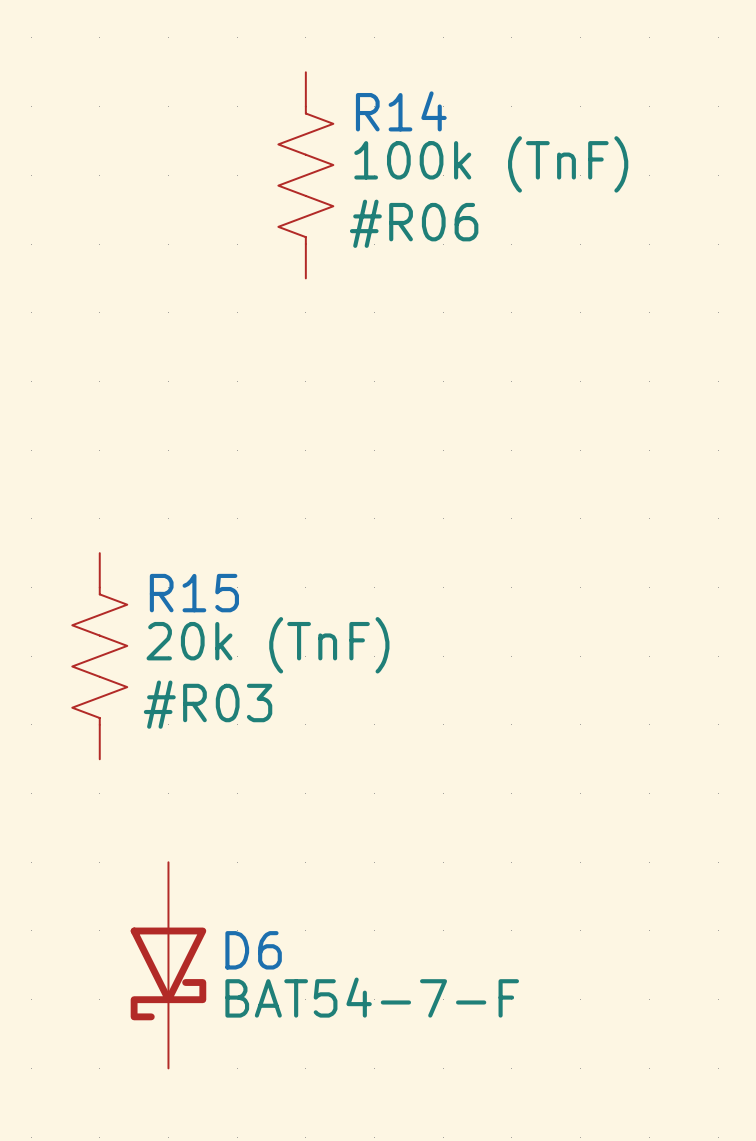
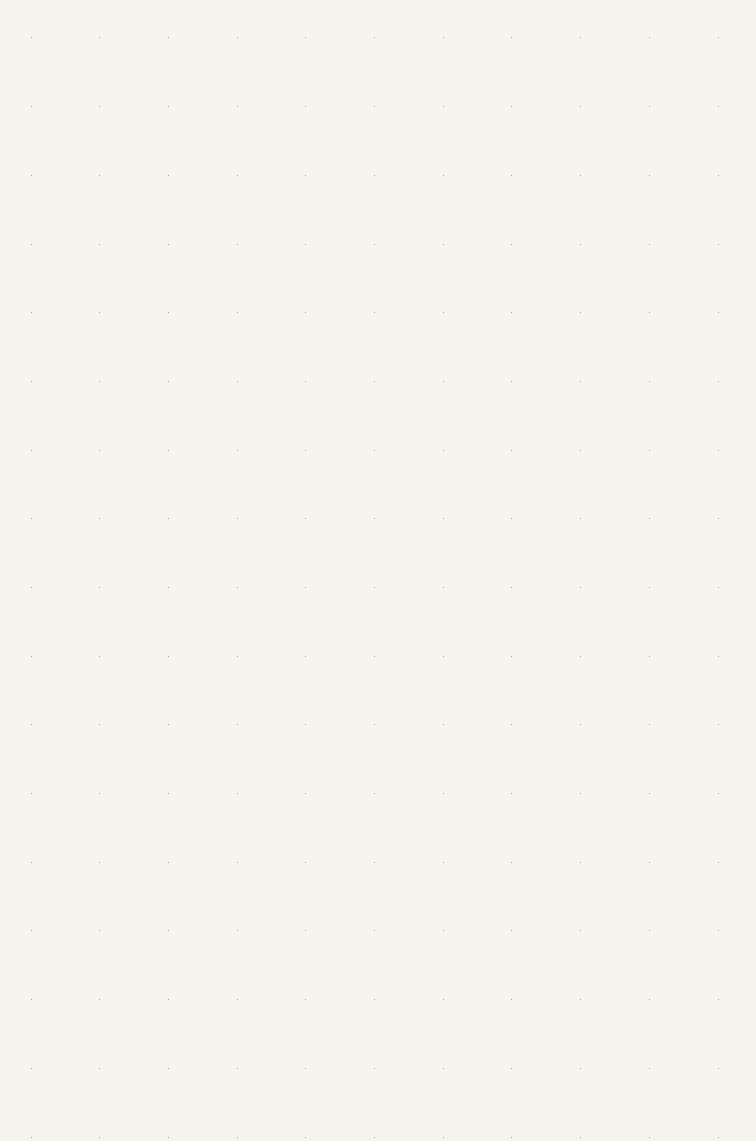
R14: 100k (TnF) (305, 175) -> none
R15: 20k (TnF) (99, 656) -> none
D6: BAT54-7-F (168, 965) -> none

